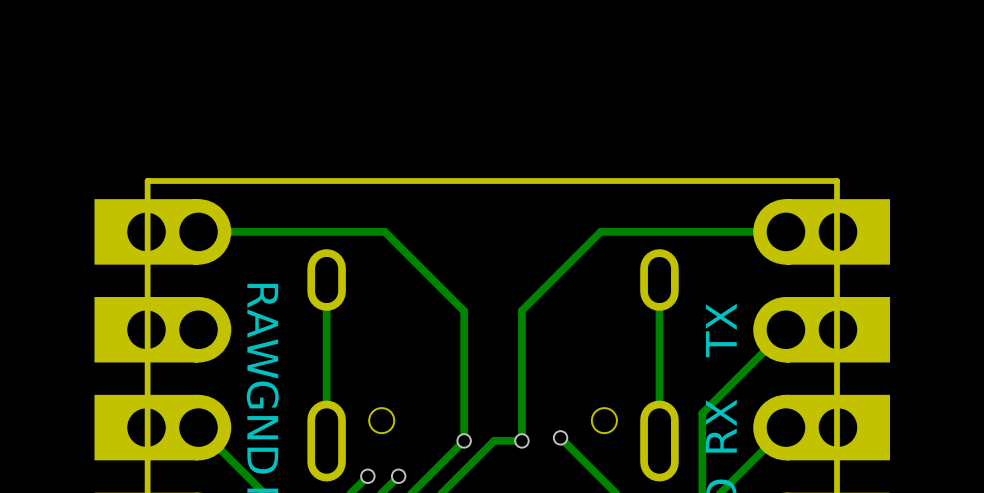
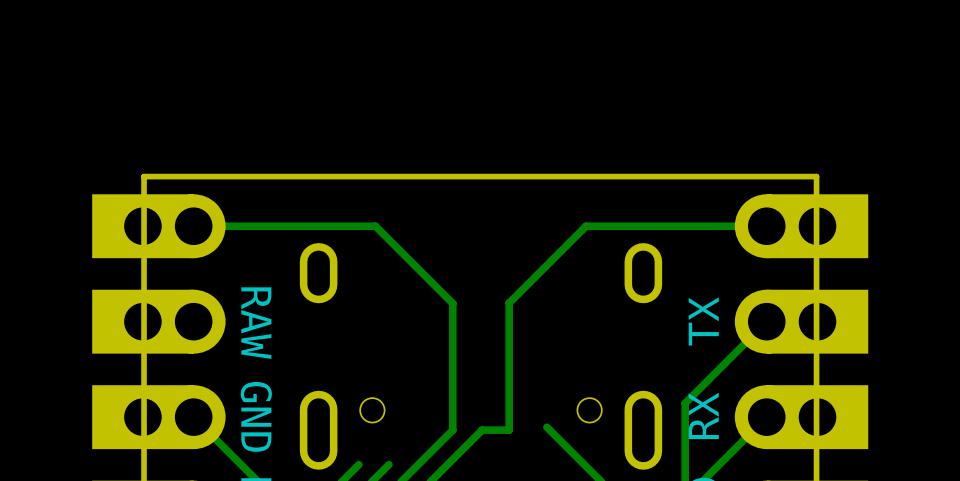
track: (326, 280) (326, 441) -> none
track: (659, 280) (659, 441) -> none
via: (560, 437) -> none
via: (464, 440) -> none
via: (521, 440) -> none
via: (367, 476) -> none
via: (398, 476) -> none

